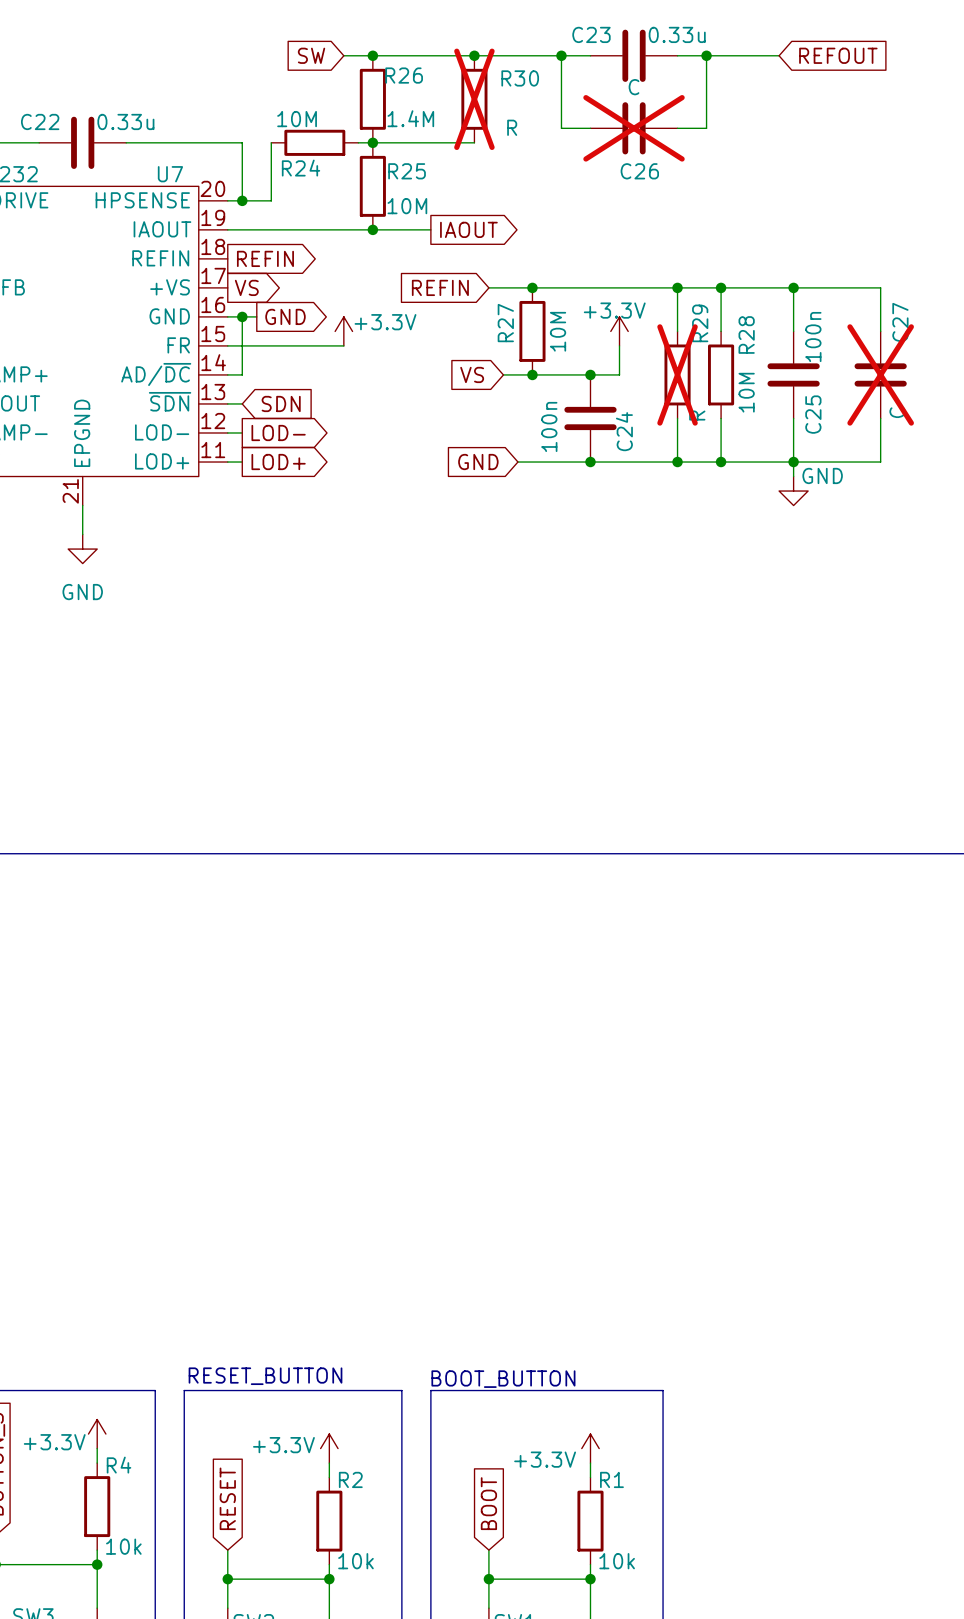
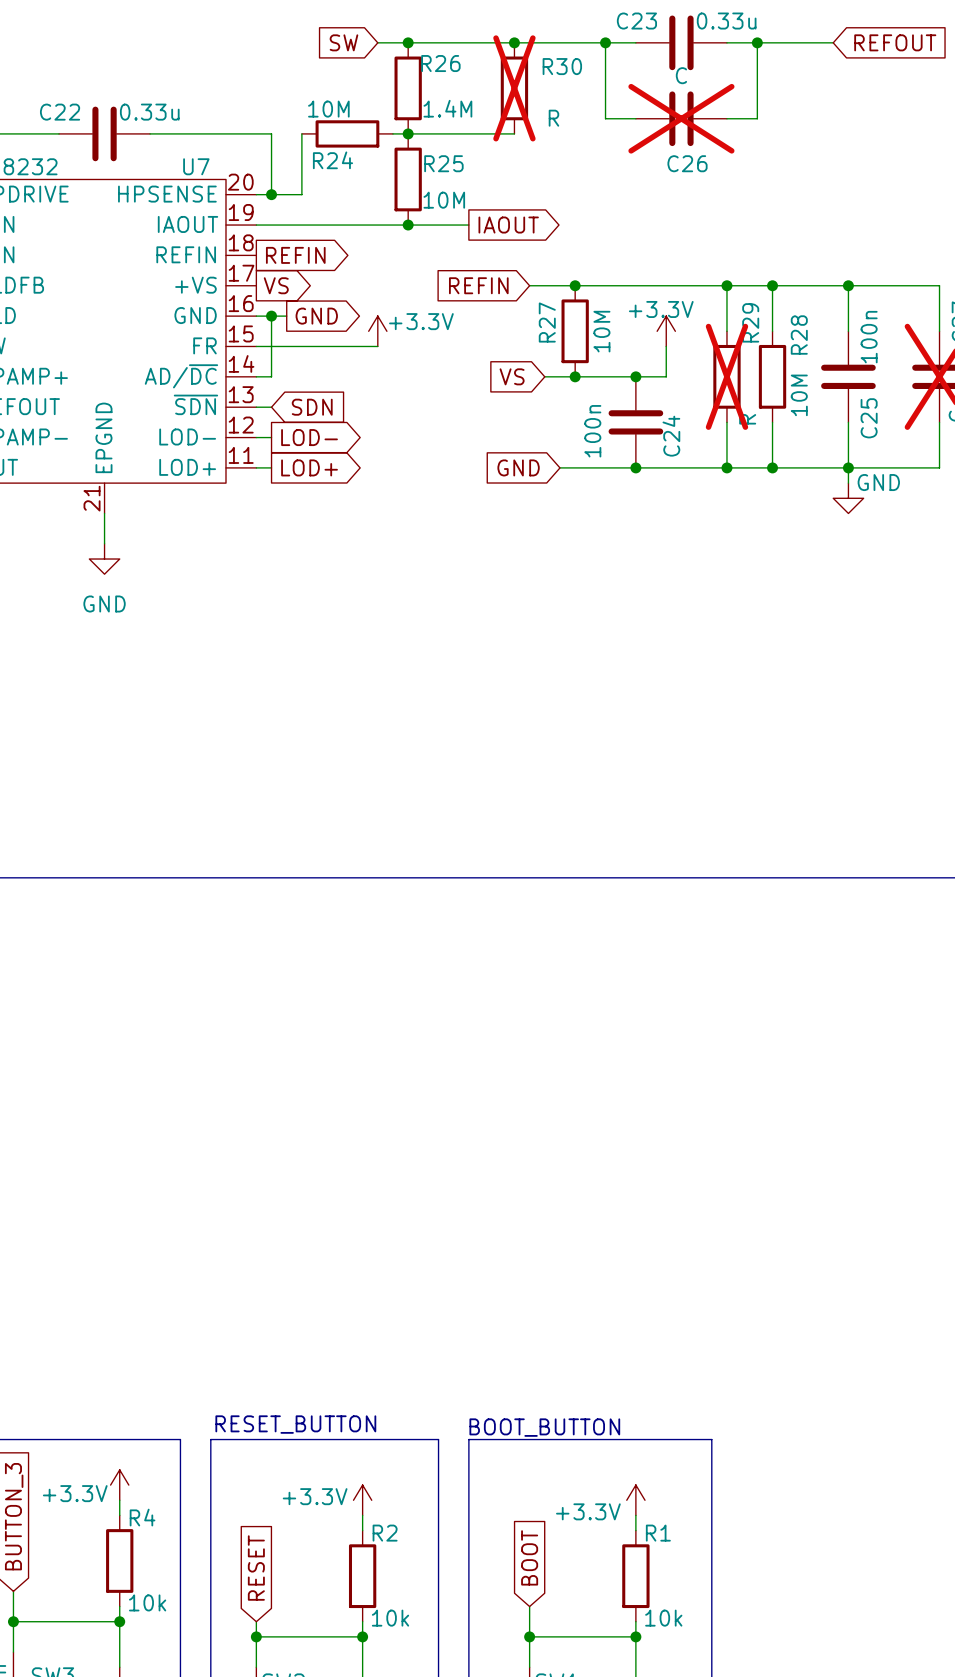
global label position: RESET (227, 1498) -> RESET (256, 1568)
wire: (227, 1550) (227, 1564) -> none

